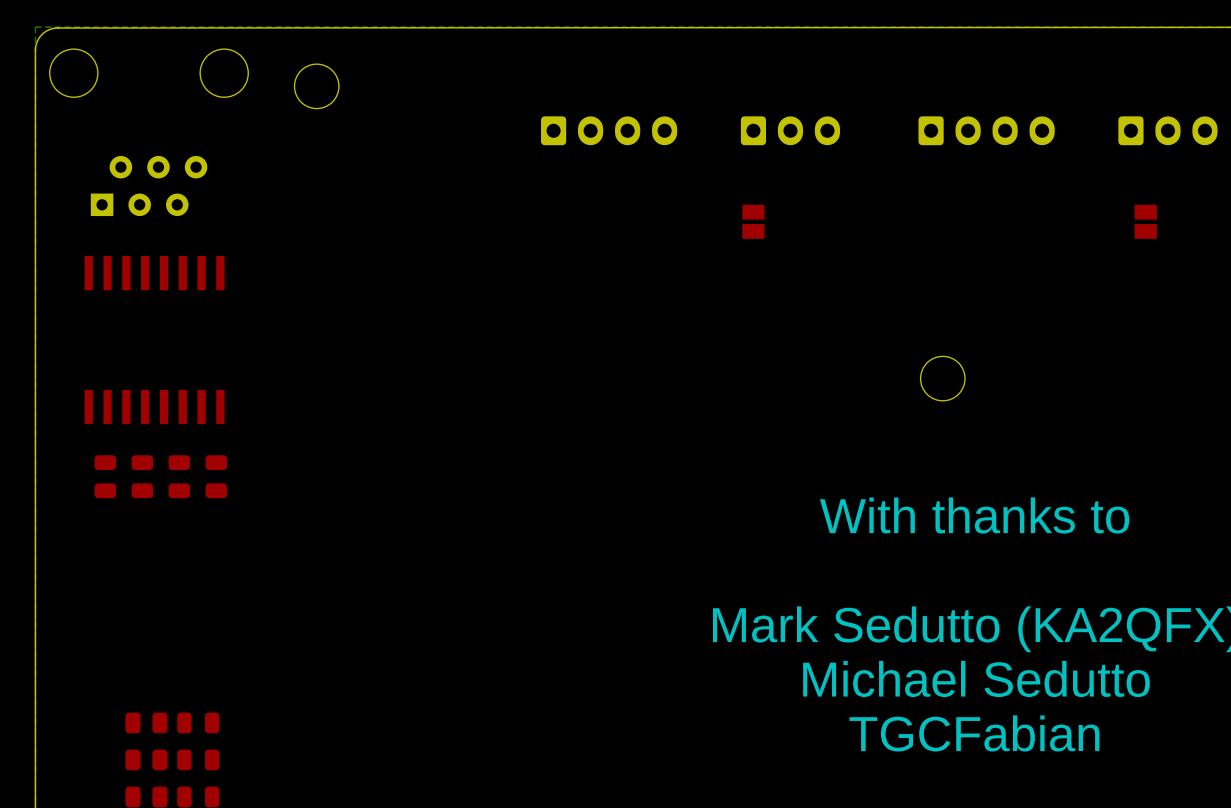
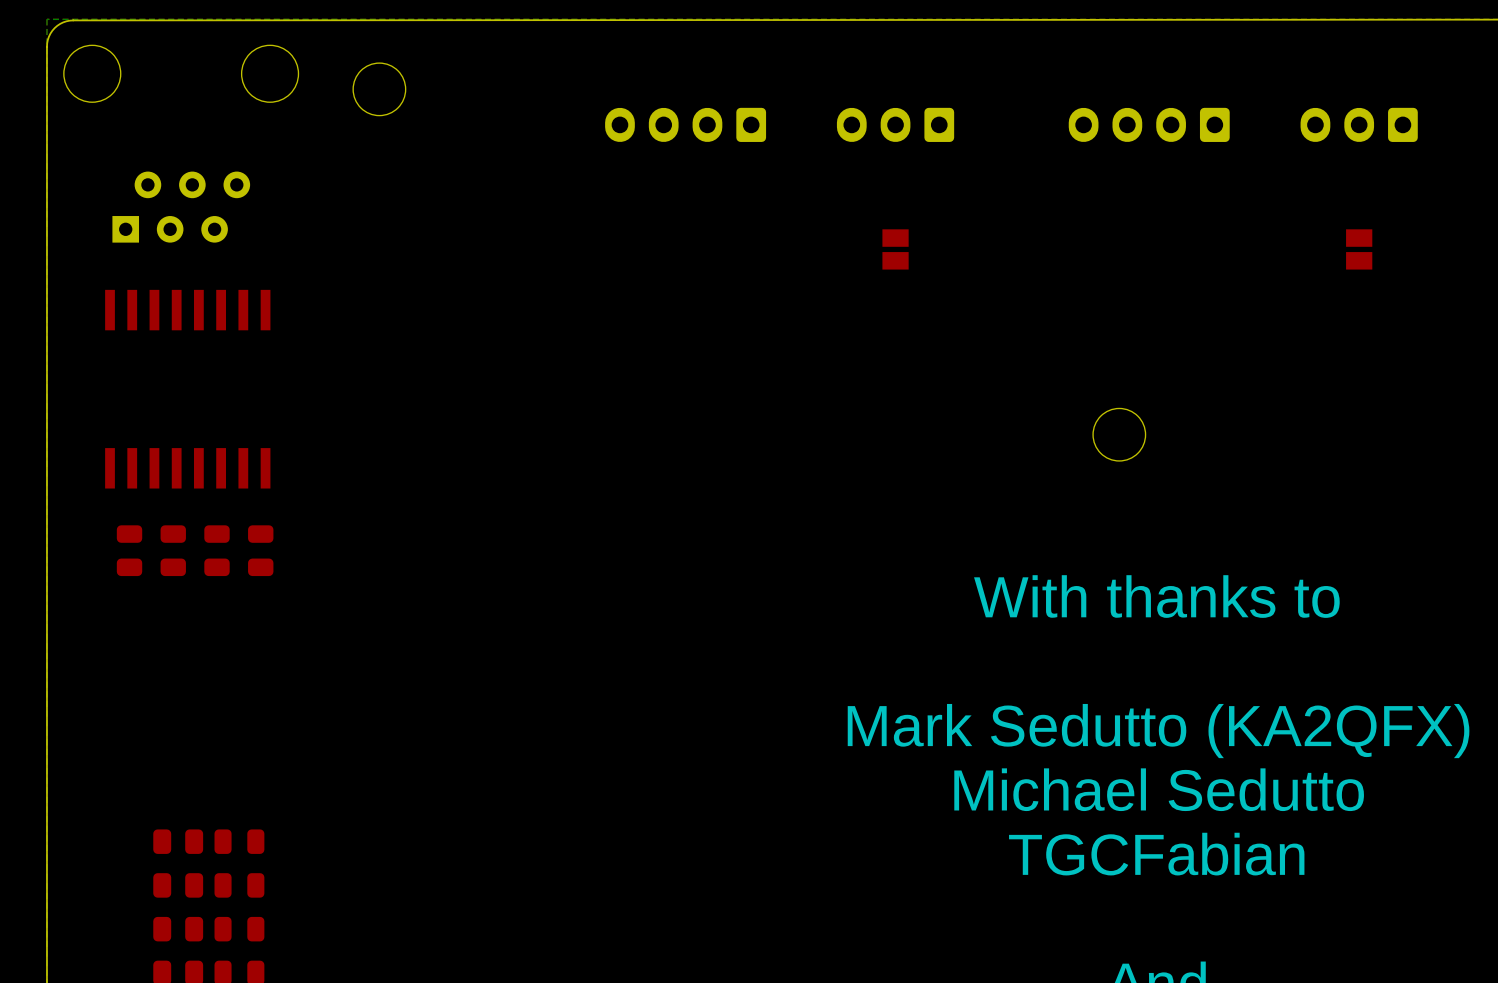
part rotation: 0° (609, 130) -> 180° (685, 124)
part rotation: 0° (790, 130) -> 180° (895, 124)
part rotation: 0° (986, 130) -> 180° (1149, 124)
part rotation: 0° (1167, 130) -> 180° (1359, 124)

